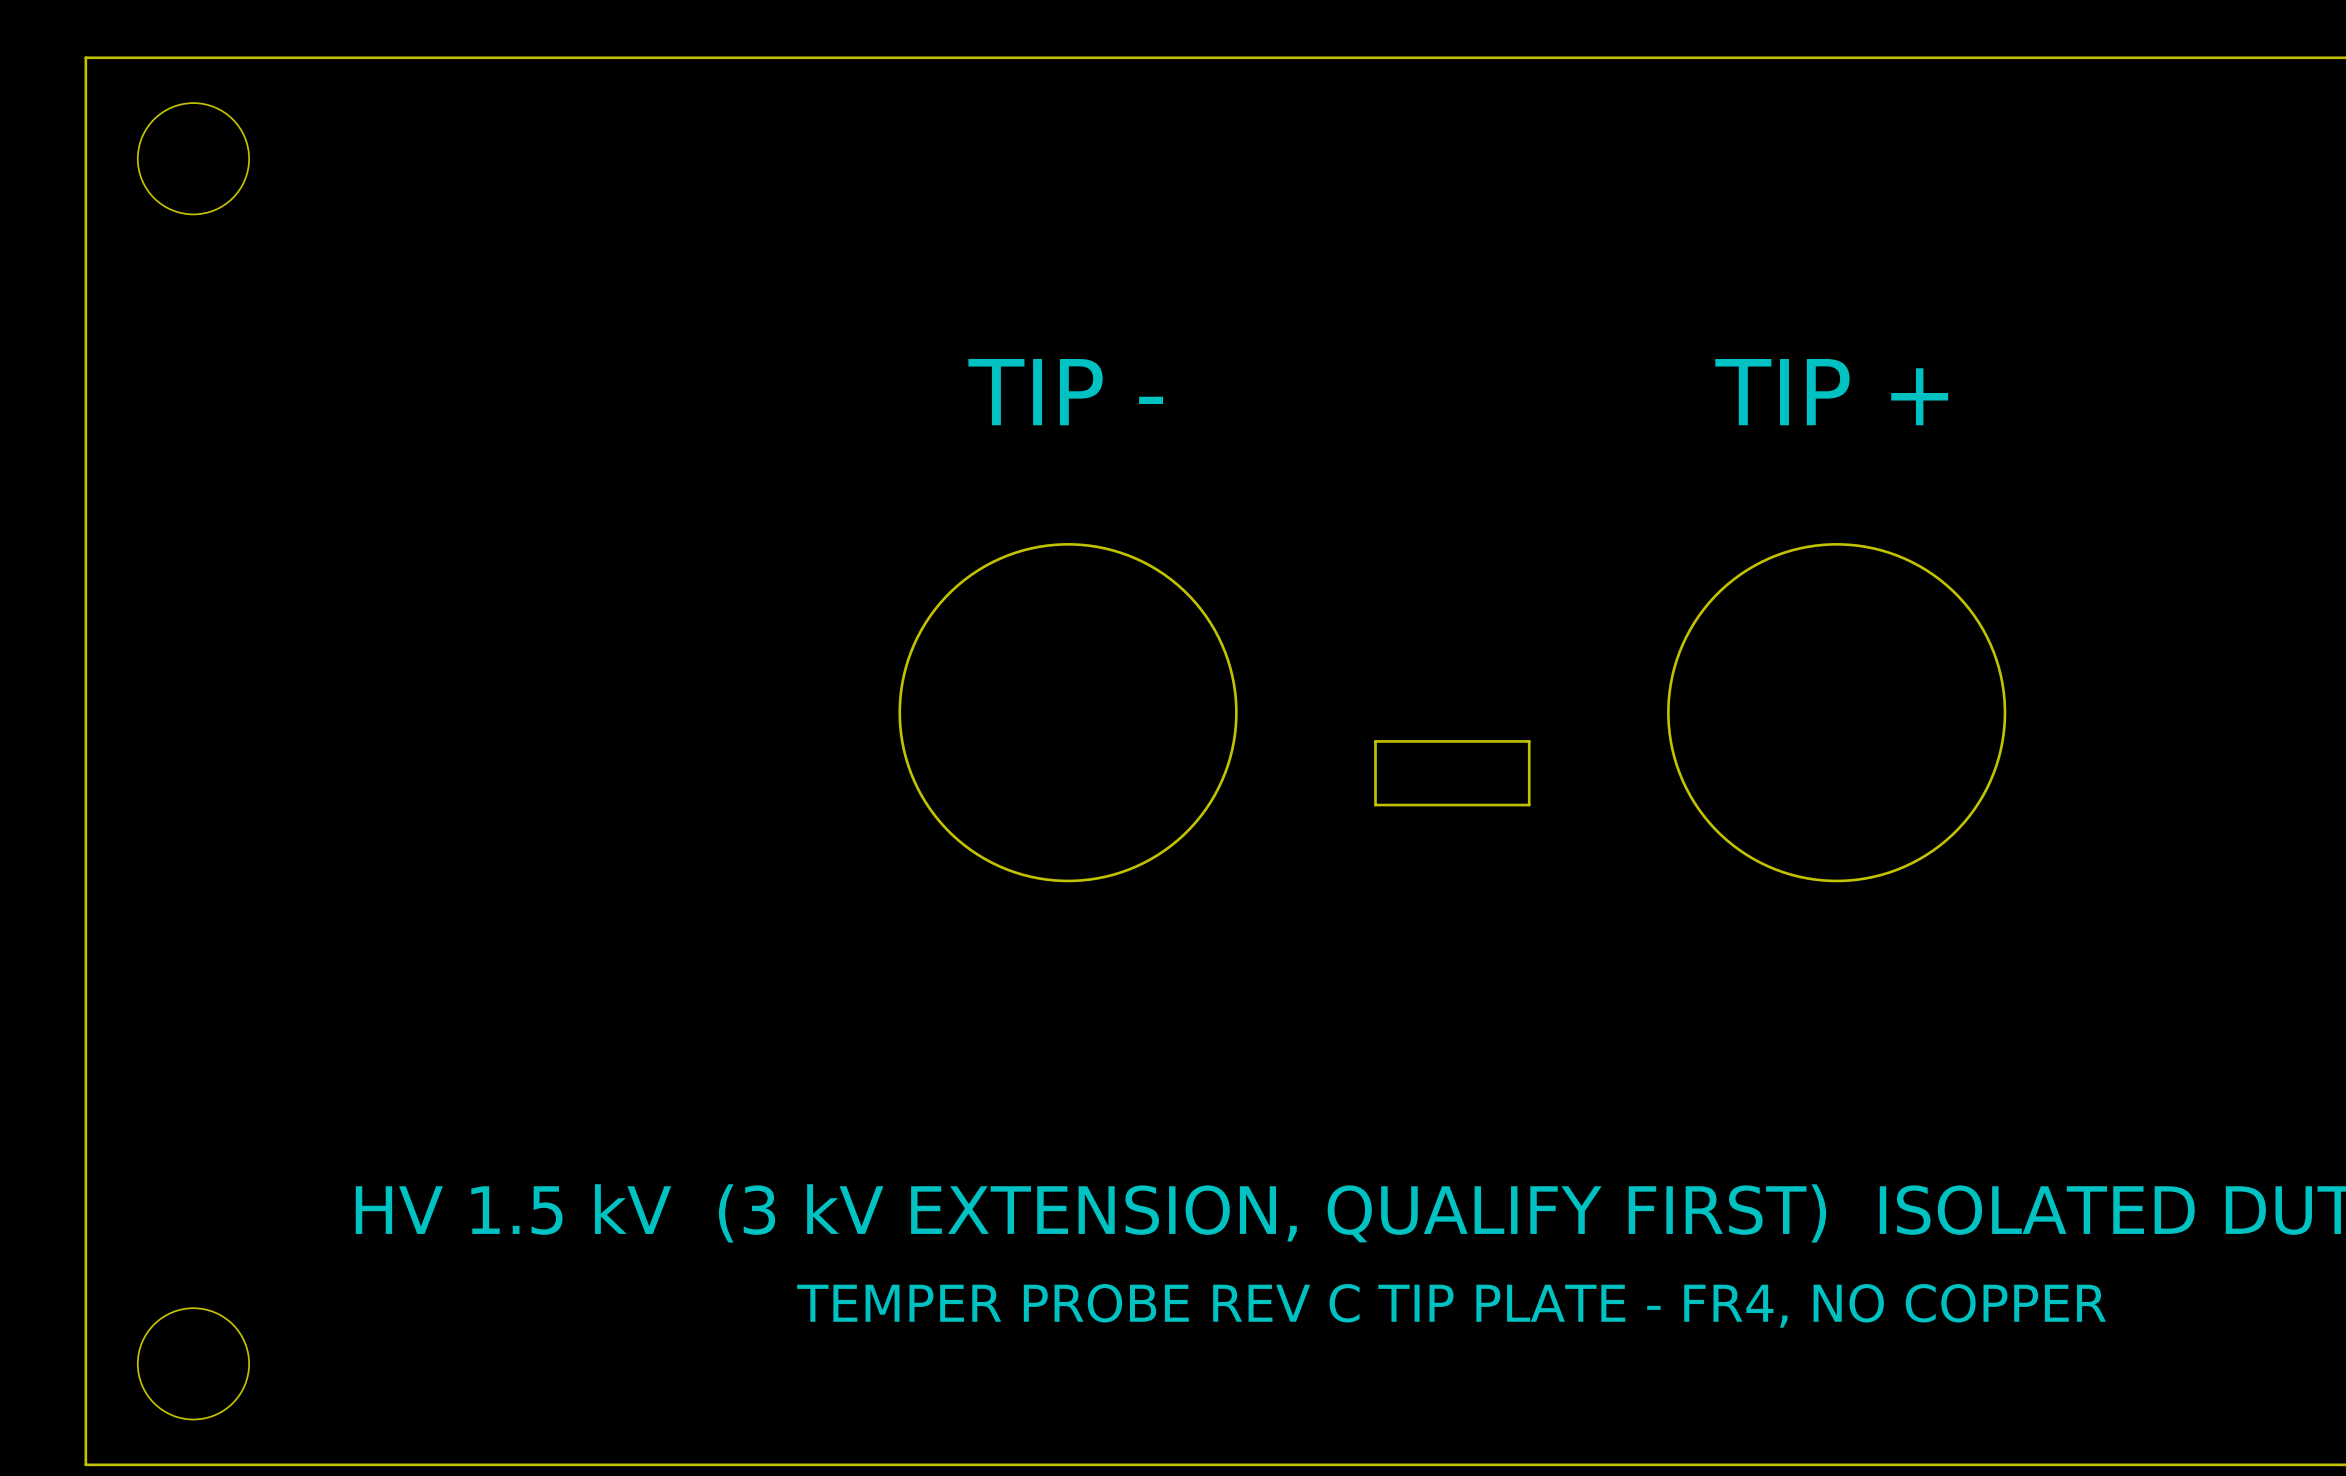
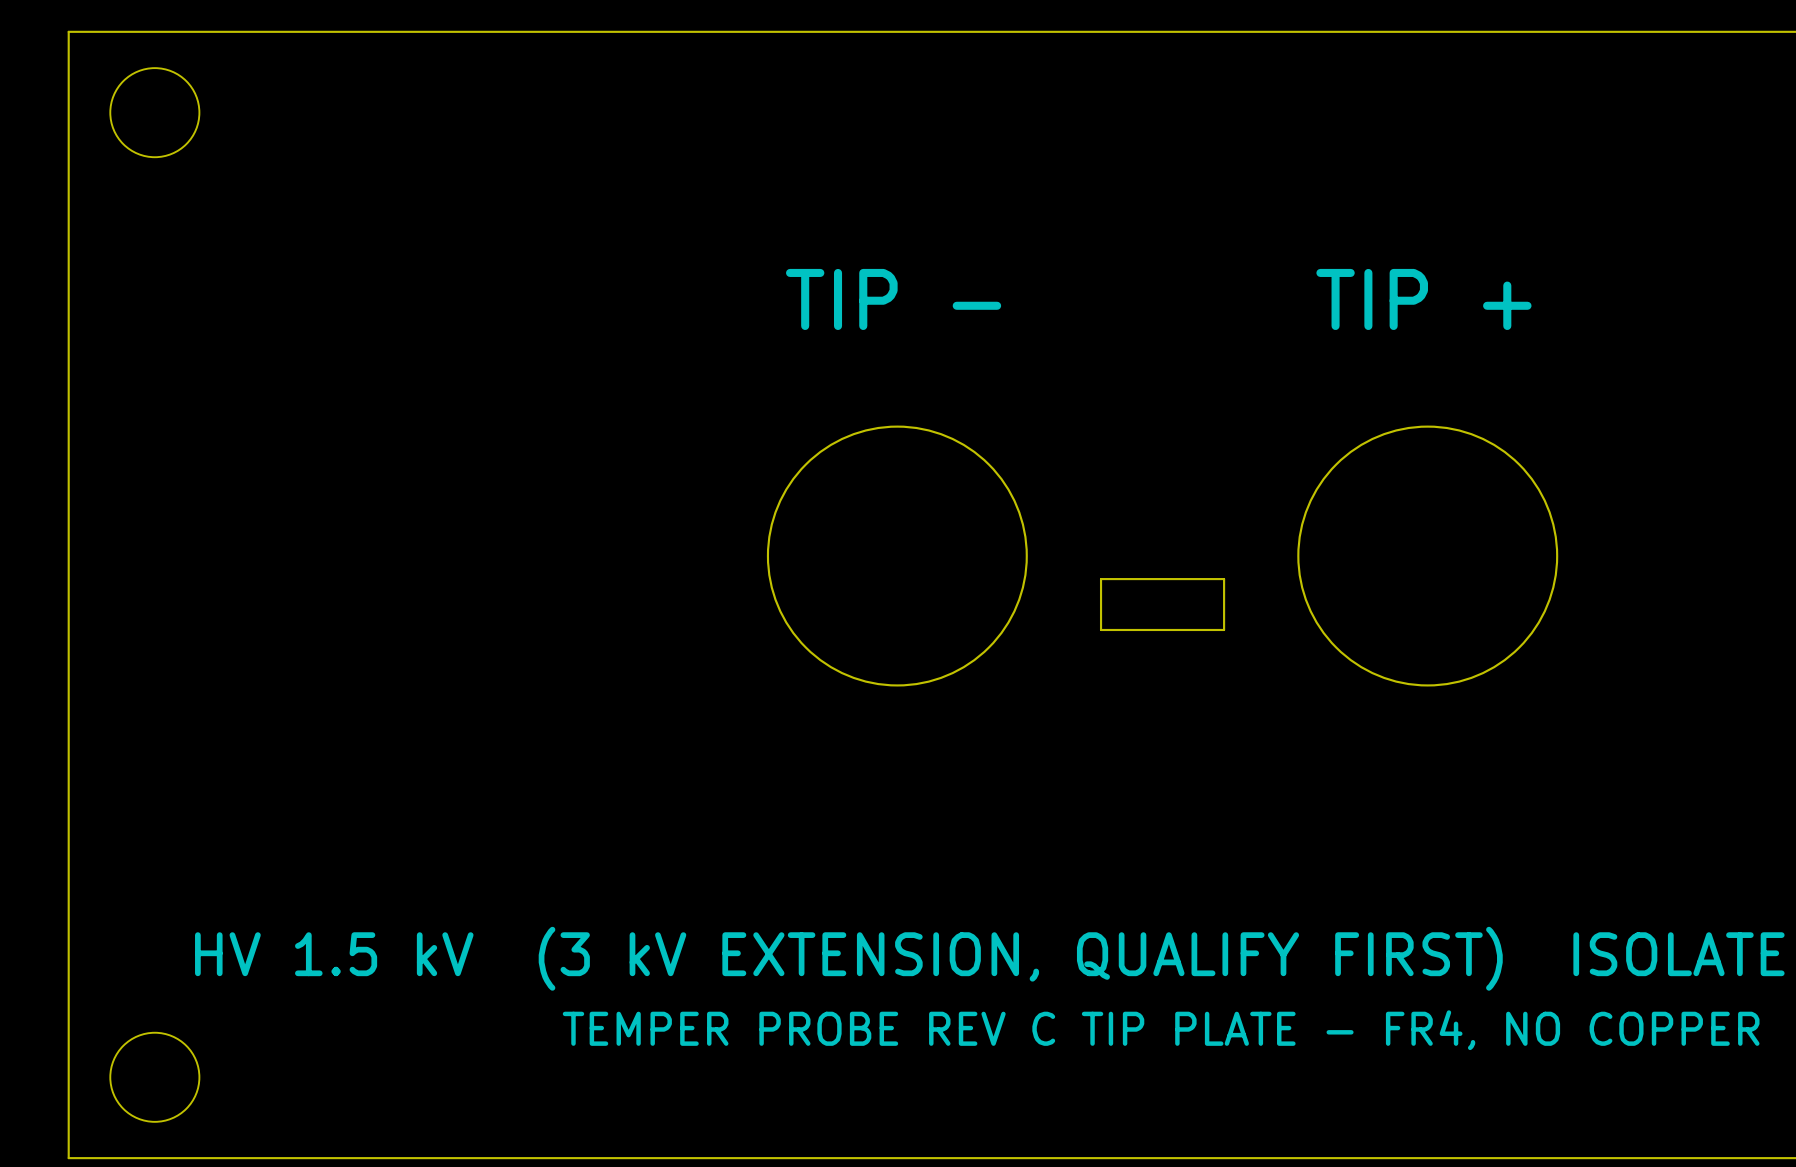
text position: TIP - (1065, 392) -> TIP - (893, 299)
text position: TIP + (1831, 392) -> TIP + (1423, 299)
round board edge: [898, 543, 1238, 883] -> none
round board edge: [1667, 543, 2007, 883] -> none
round board edge: none -> [766, 425, 1028, 687]
round board edge: none -> [1297, 425, 1559, 687]

